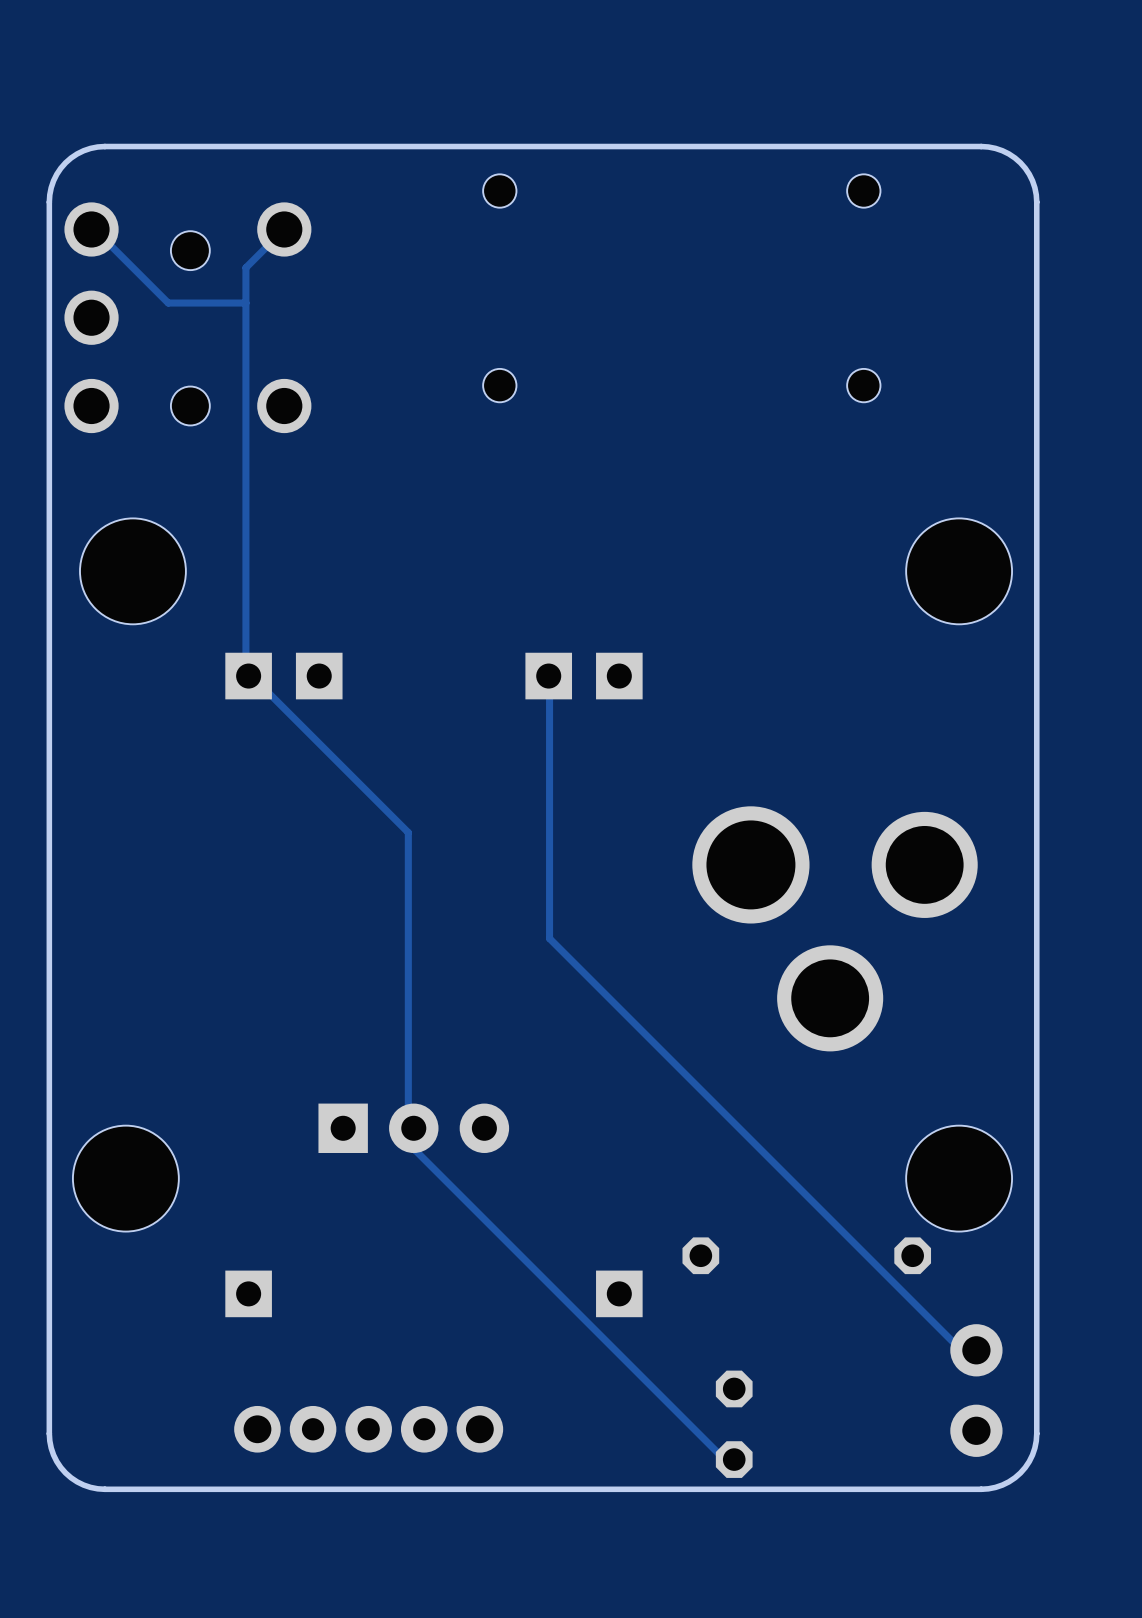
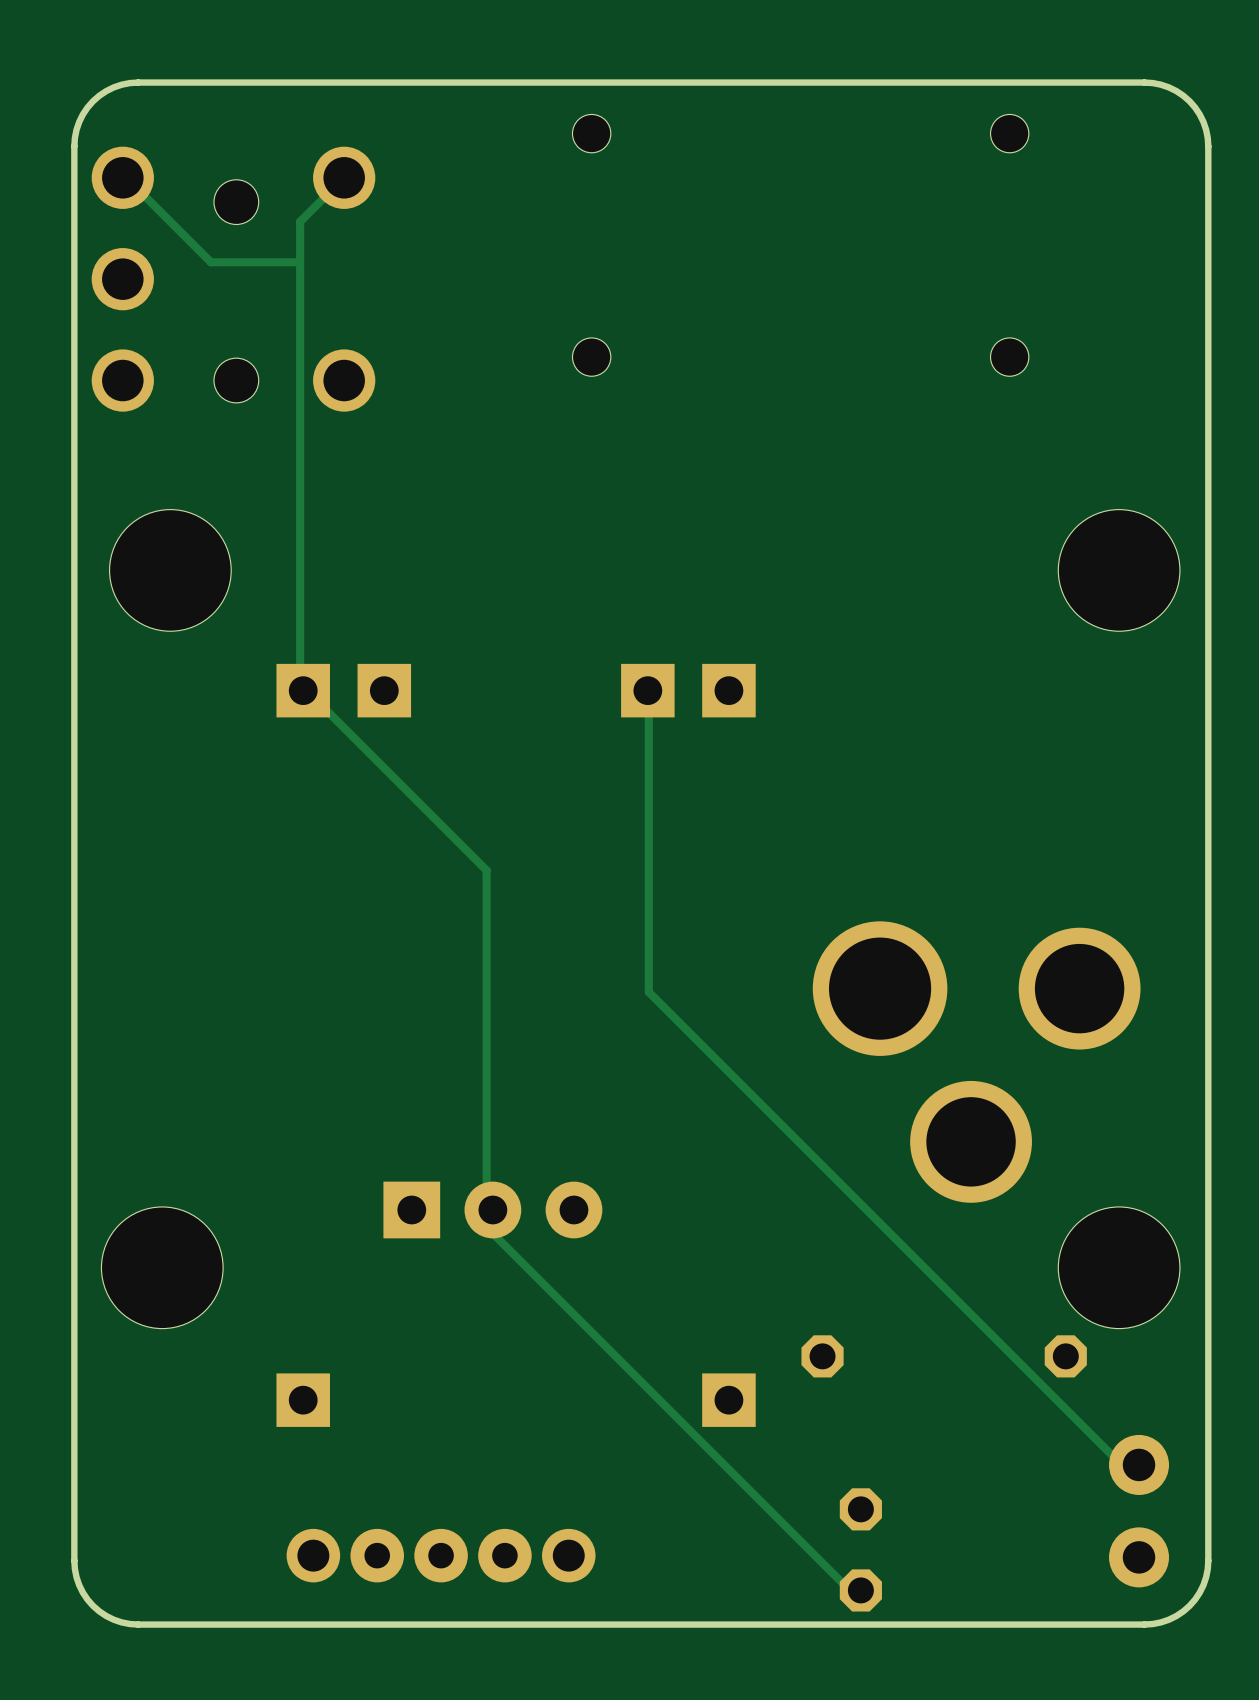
part position: (835, 928) -> (976, 1062)

